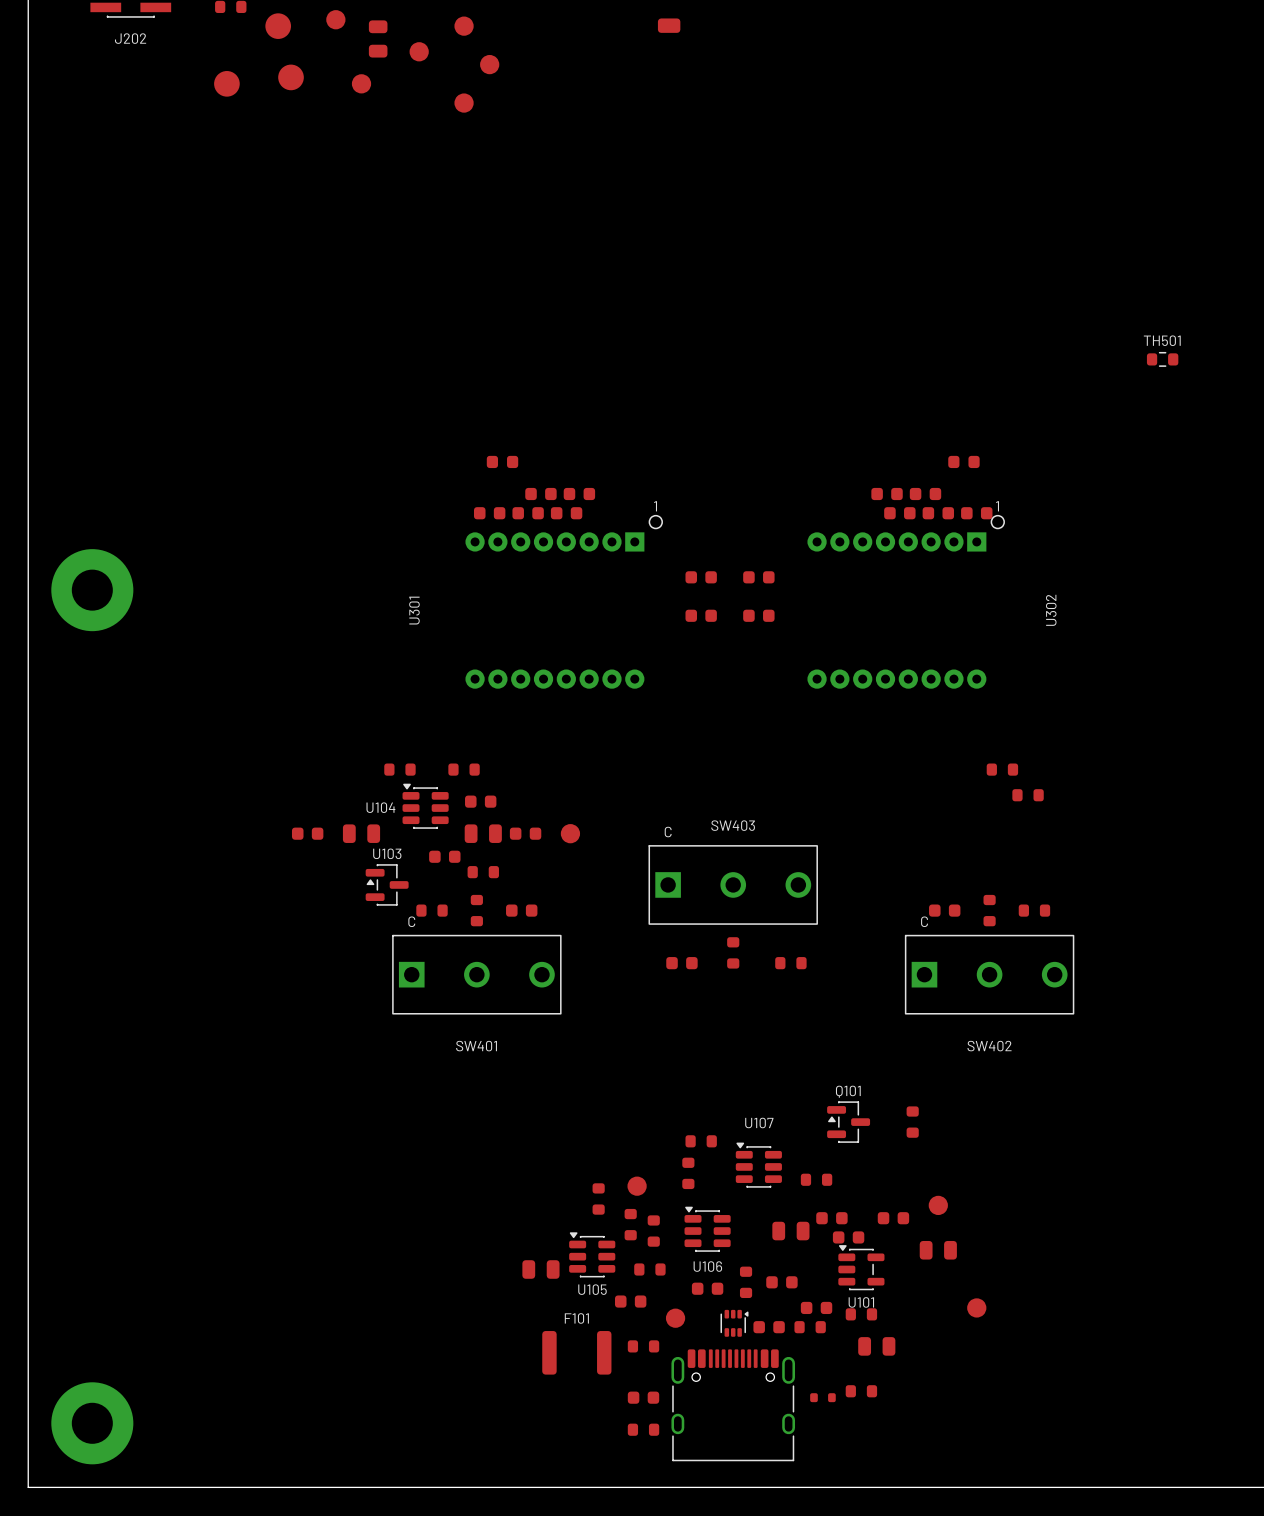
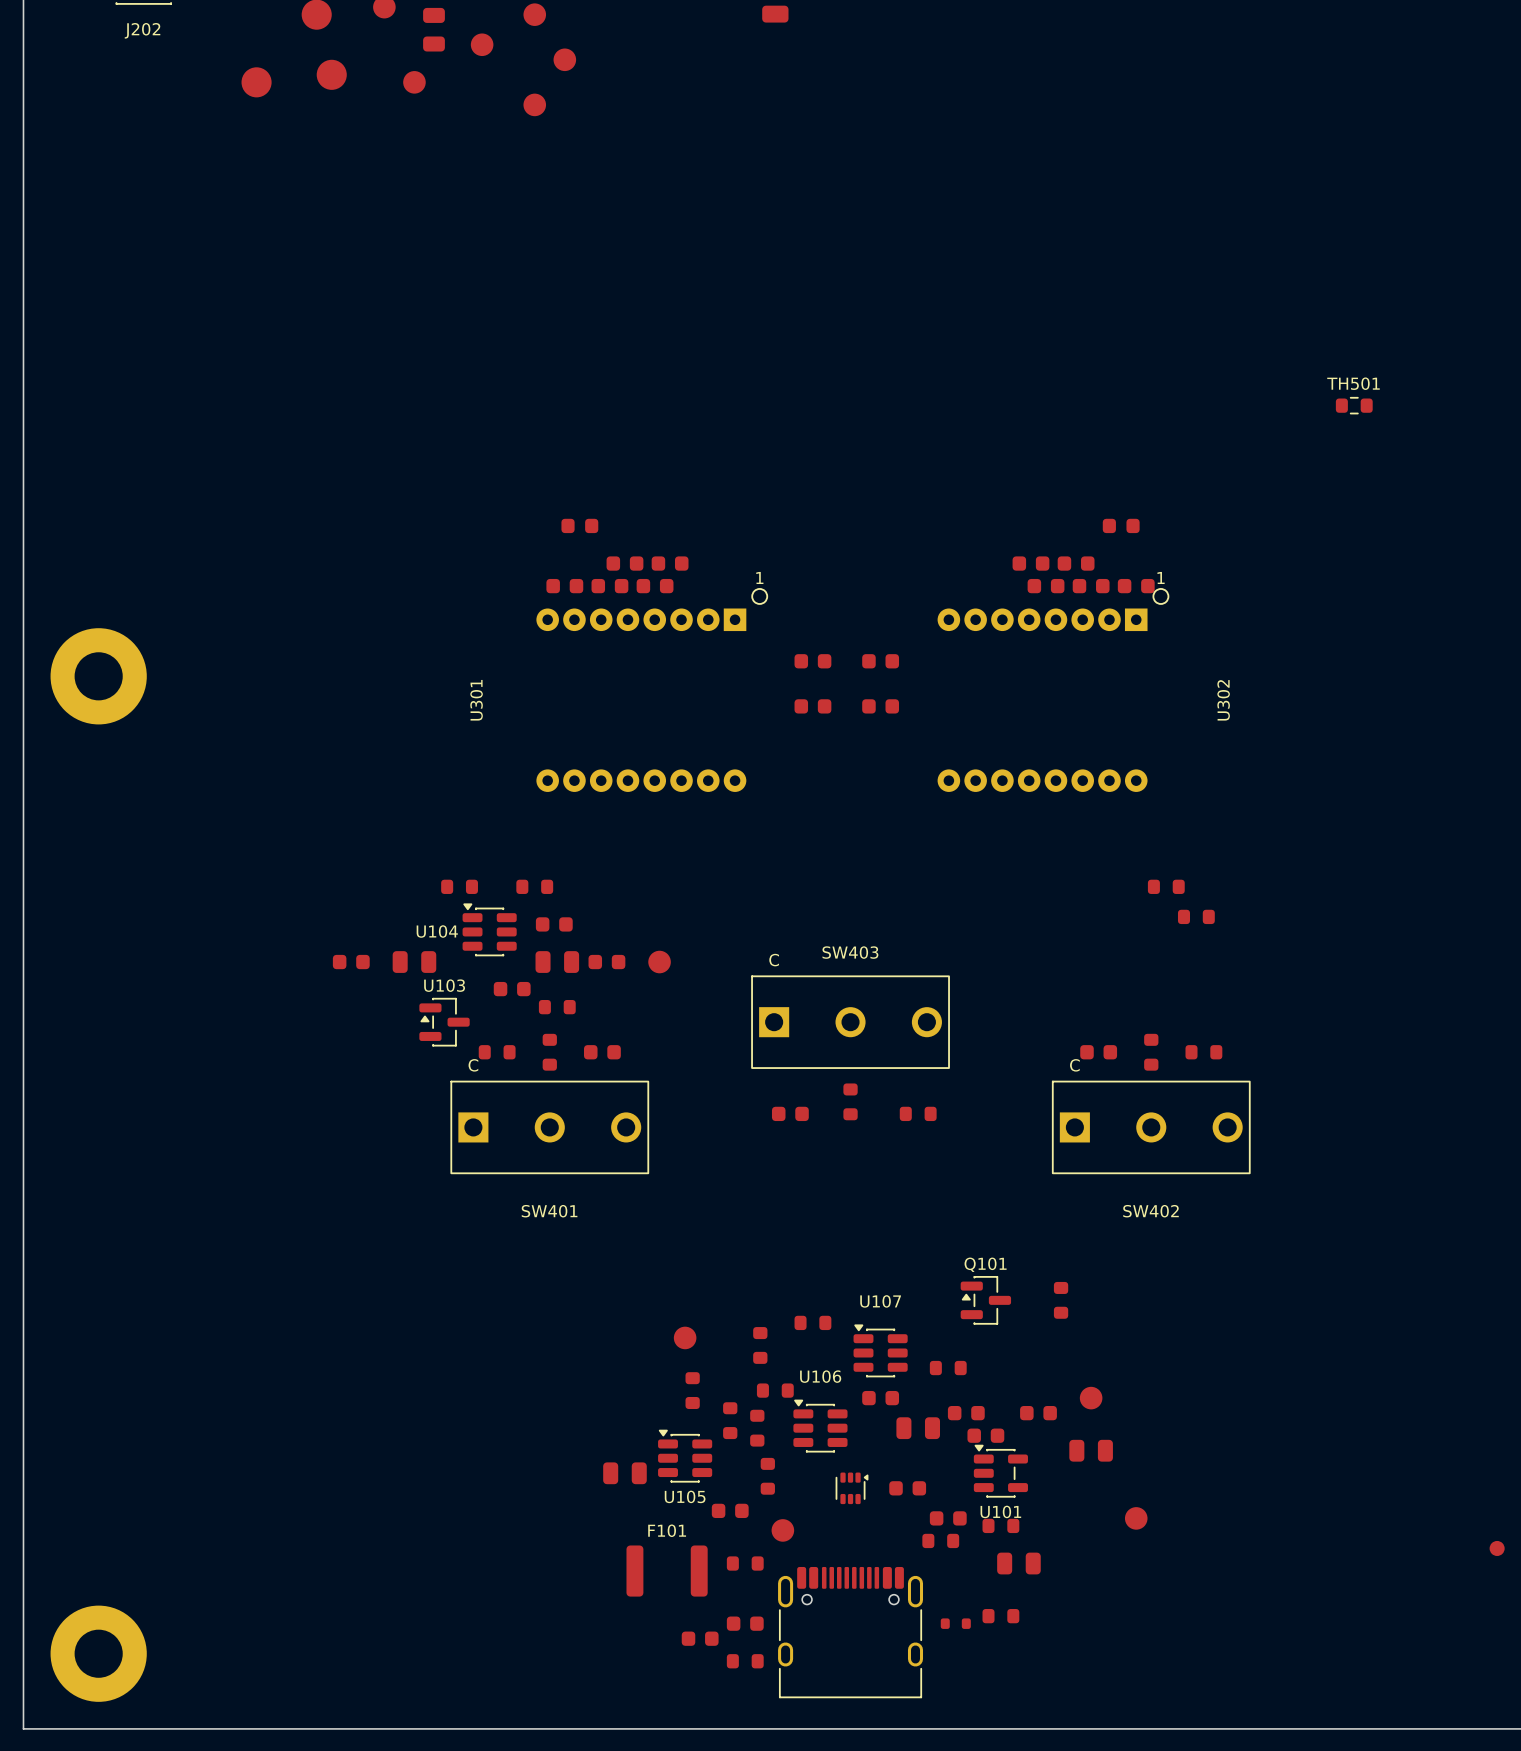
part: none -> (760, 1345)
part: (688, 1173) -> none
part position: (637, 1186) -> (685, 1337)
part: none -> (775, 1390)
part: none -> (880, 1398)
U106 name position: U106 (707, 1266) -> U106 (820, 1376)
part footprint: [739, 1266, 753, 1299] -> [835, 1472, 869, 1505]
part rotation: 0° (649, 1269) -> 90° clockwise (767, 1476)
part: (707, 1288) -> none
part: (734, 1323) -> none
part: (769, 1327) -> none
part: none -> (700, 1638)

